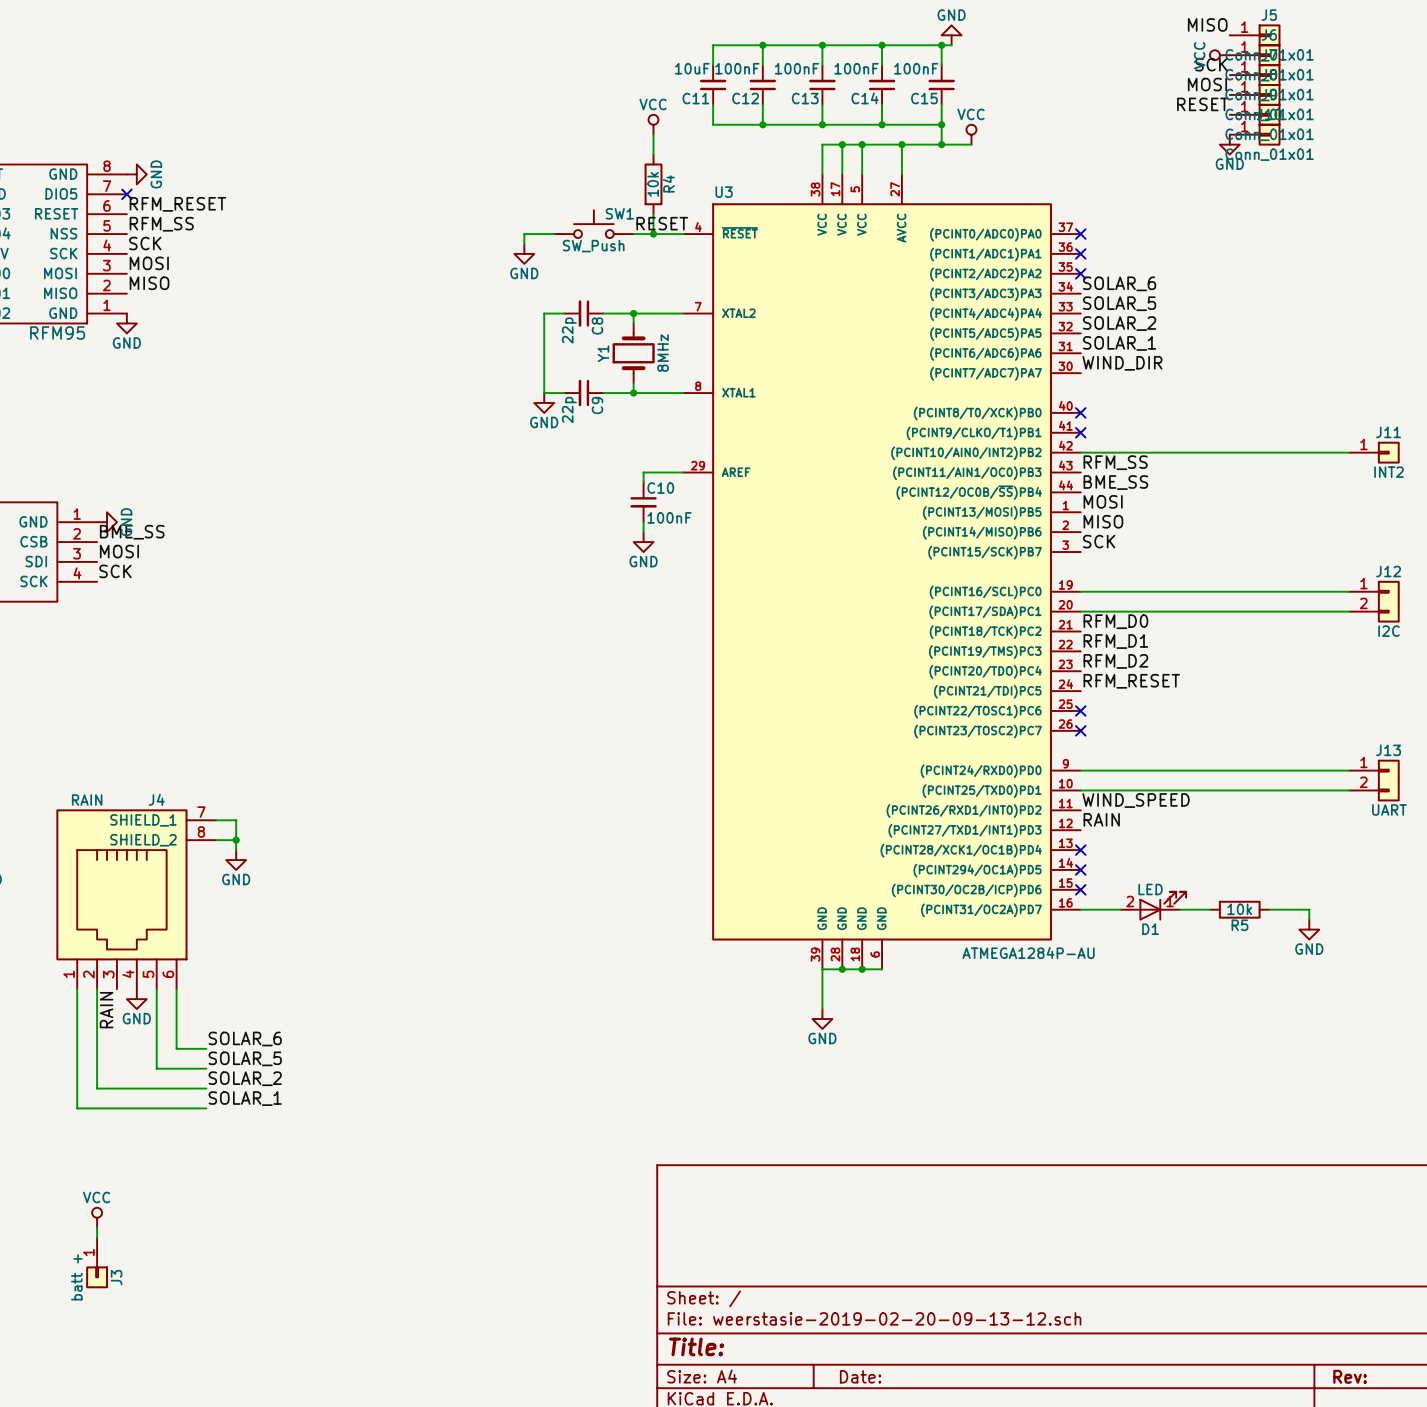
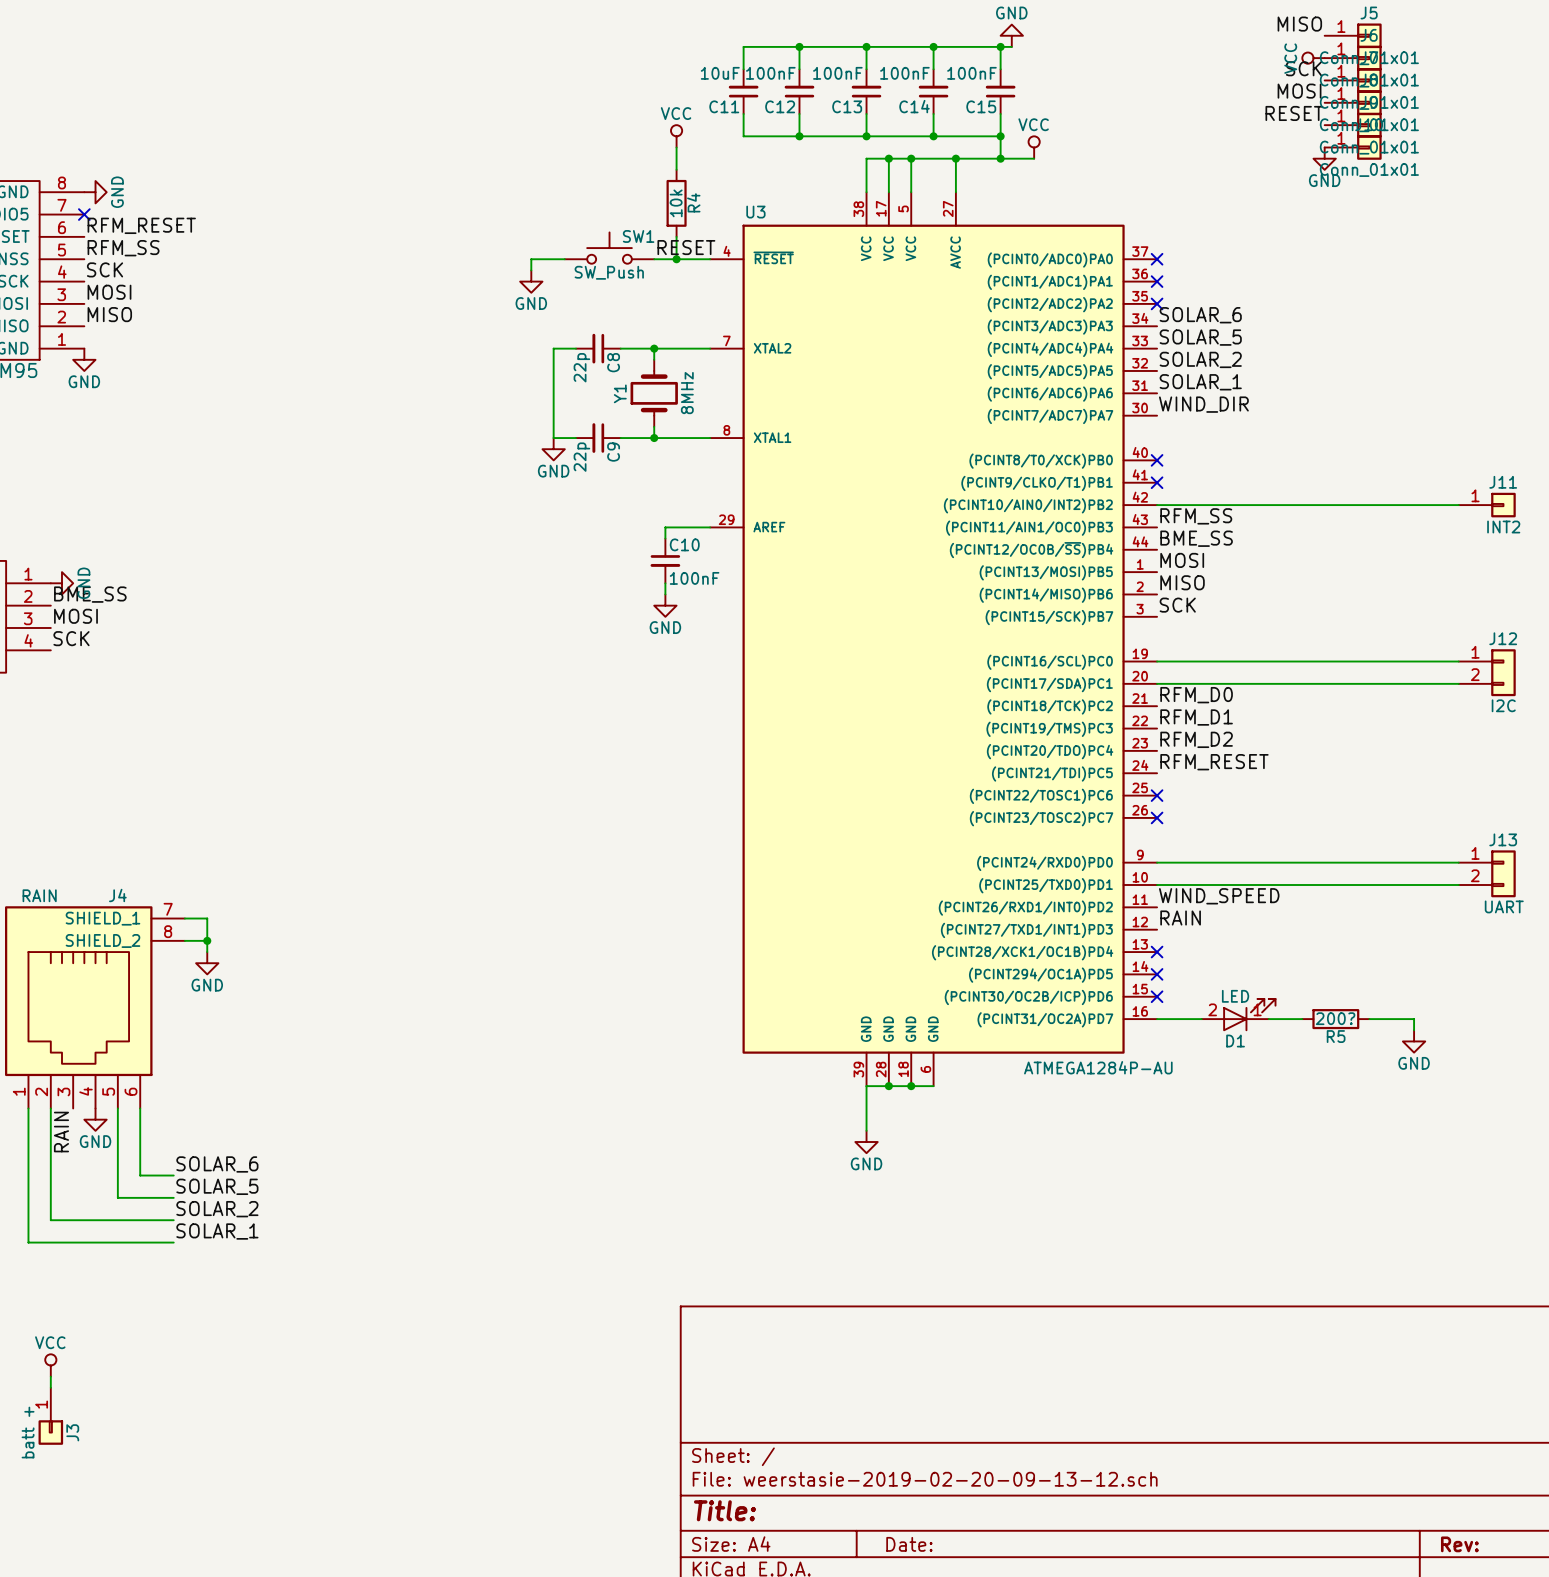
R5 value: 10k (1239, 909) -> 200? (1335, 1018)

